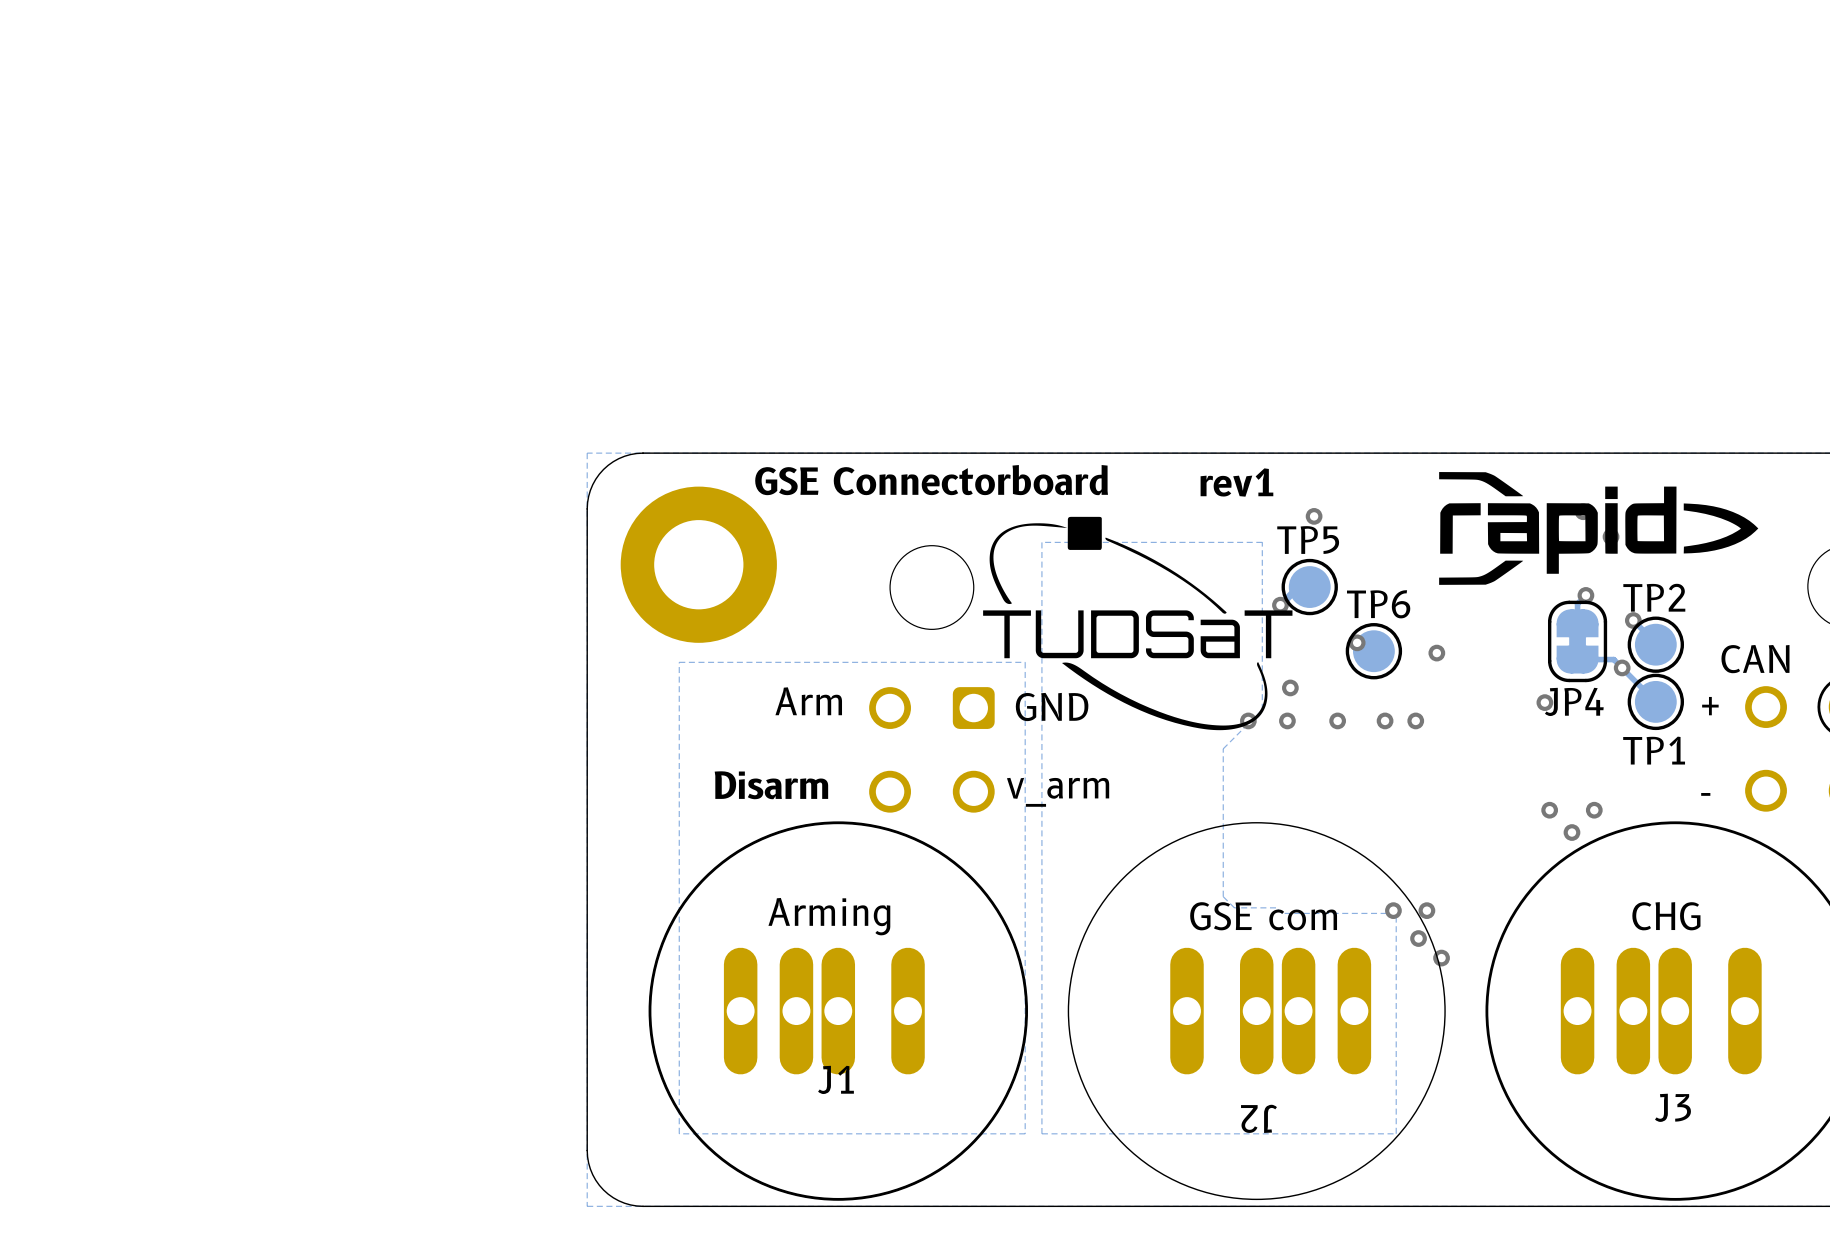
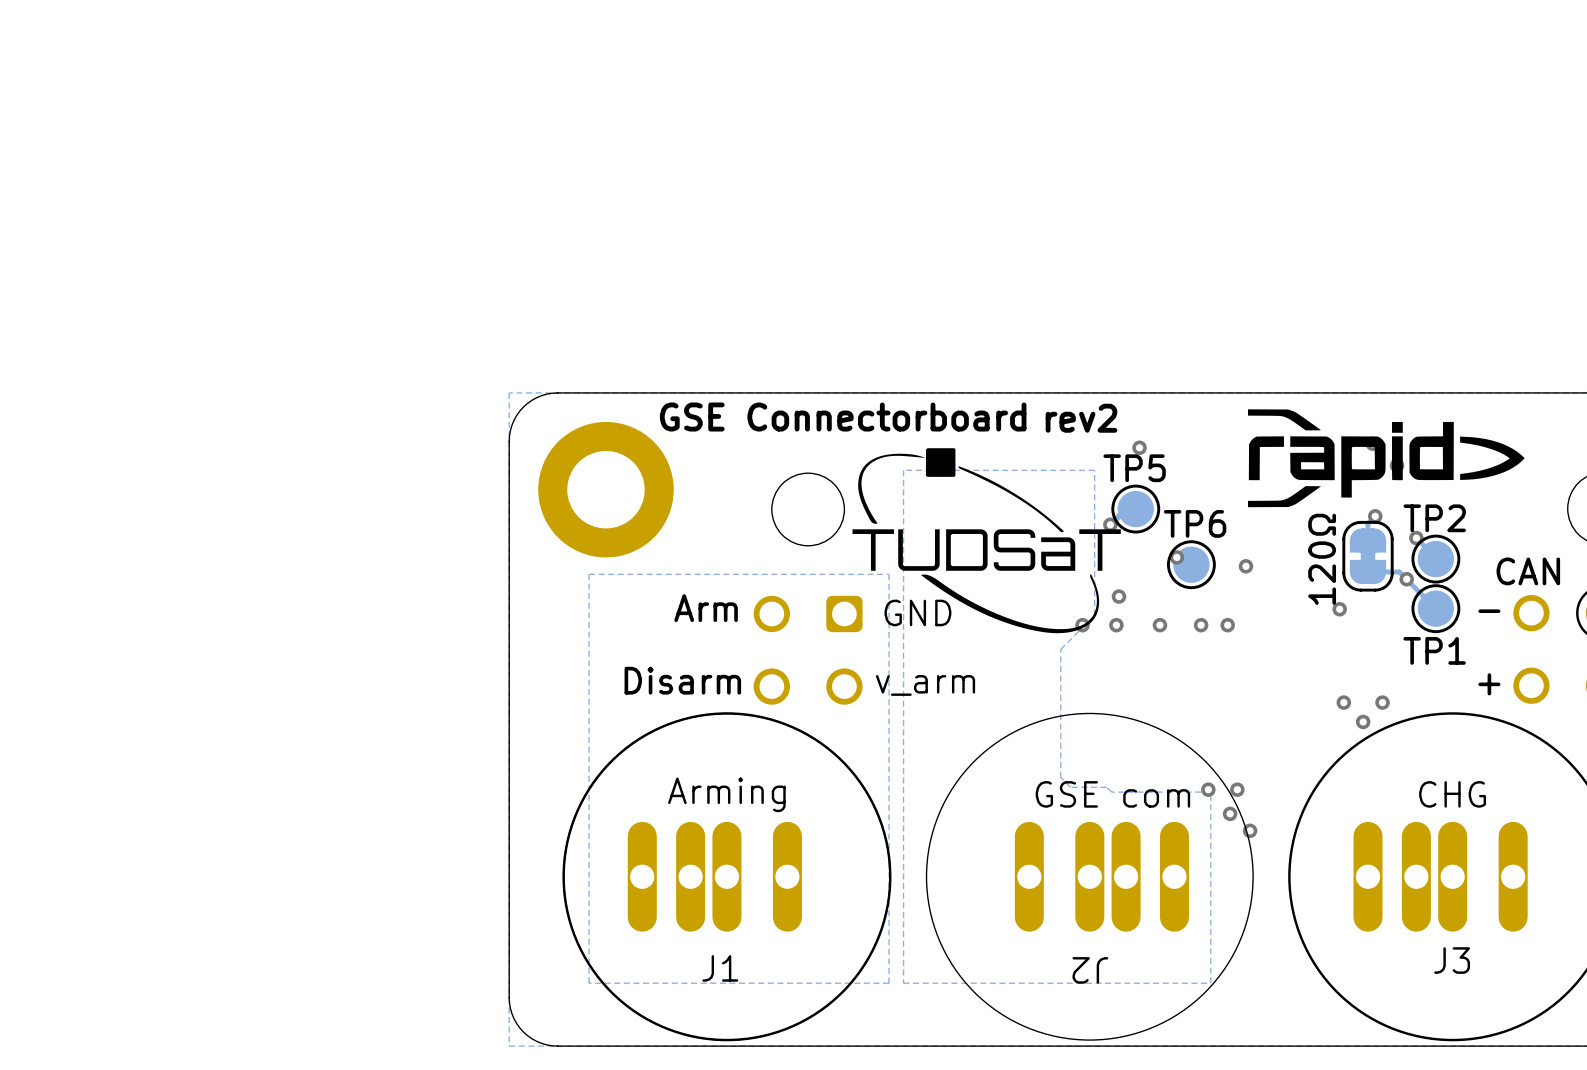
text: rev1 (1236, 482) -> rev2 (1081, 418)
text: none -> 120Ω (1322, 559)
JP4 name: JP4 (1574, 701) -> none
text: + (1710, 706) -> - (1489, 611)
text: - (1705, 794) -> + (1489, 684)
J1 name position: J1 (835, 1079) -> J1 (720, 968)

